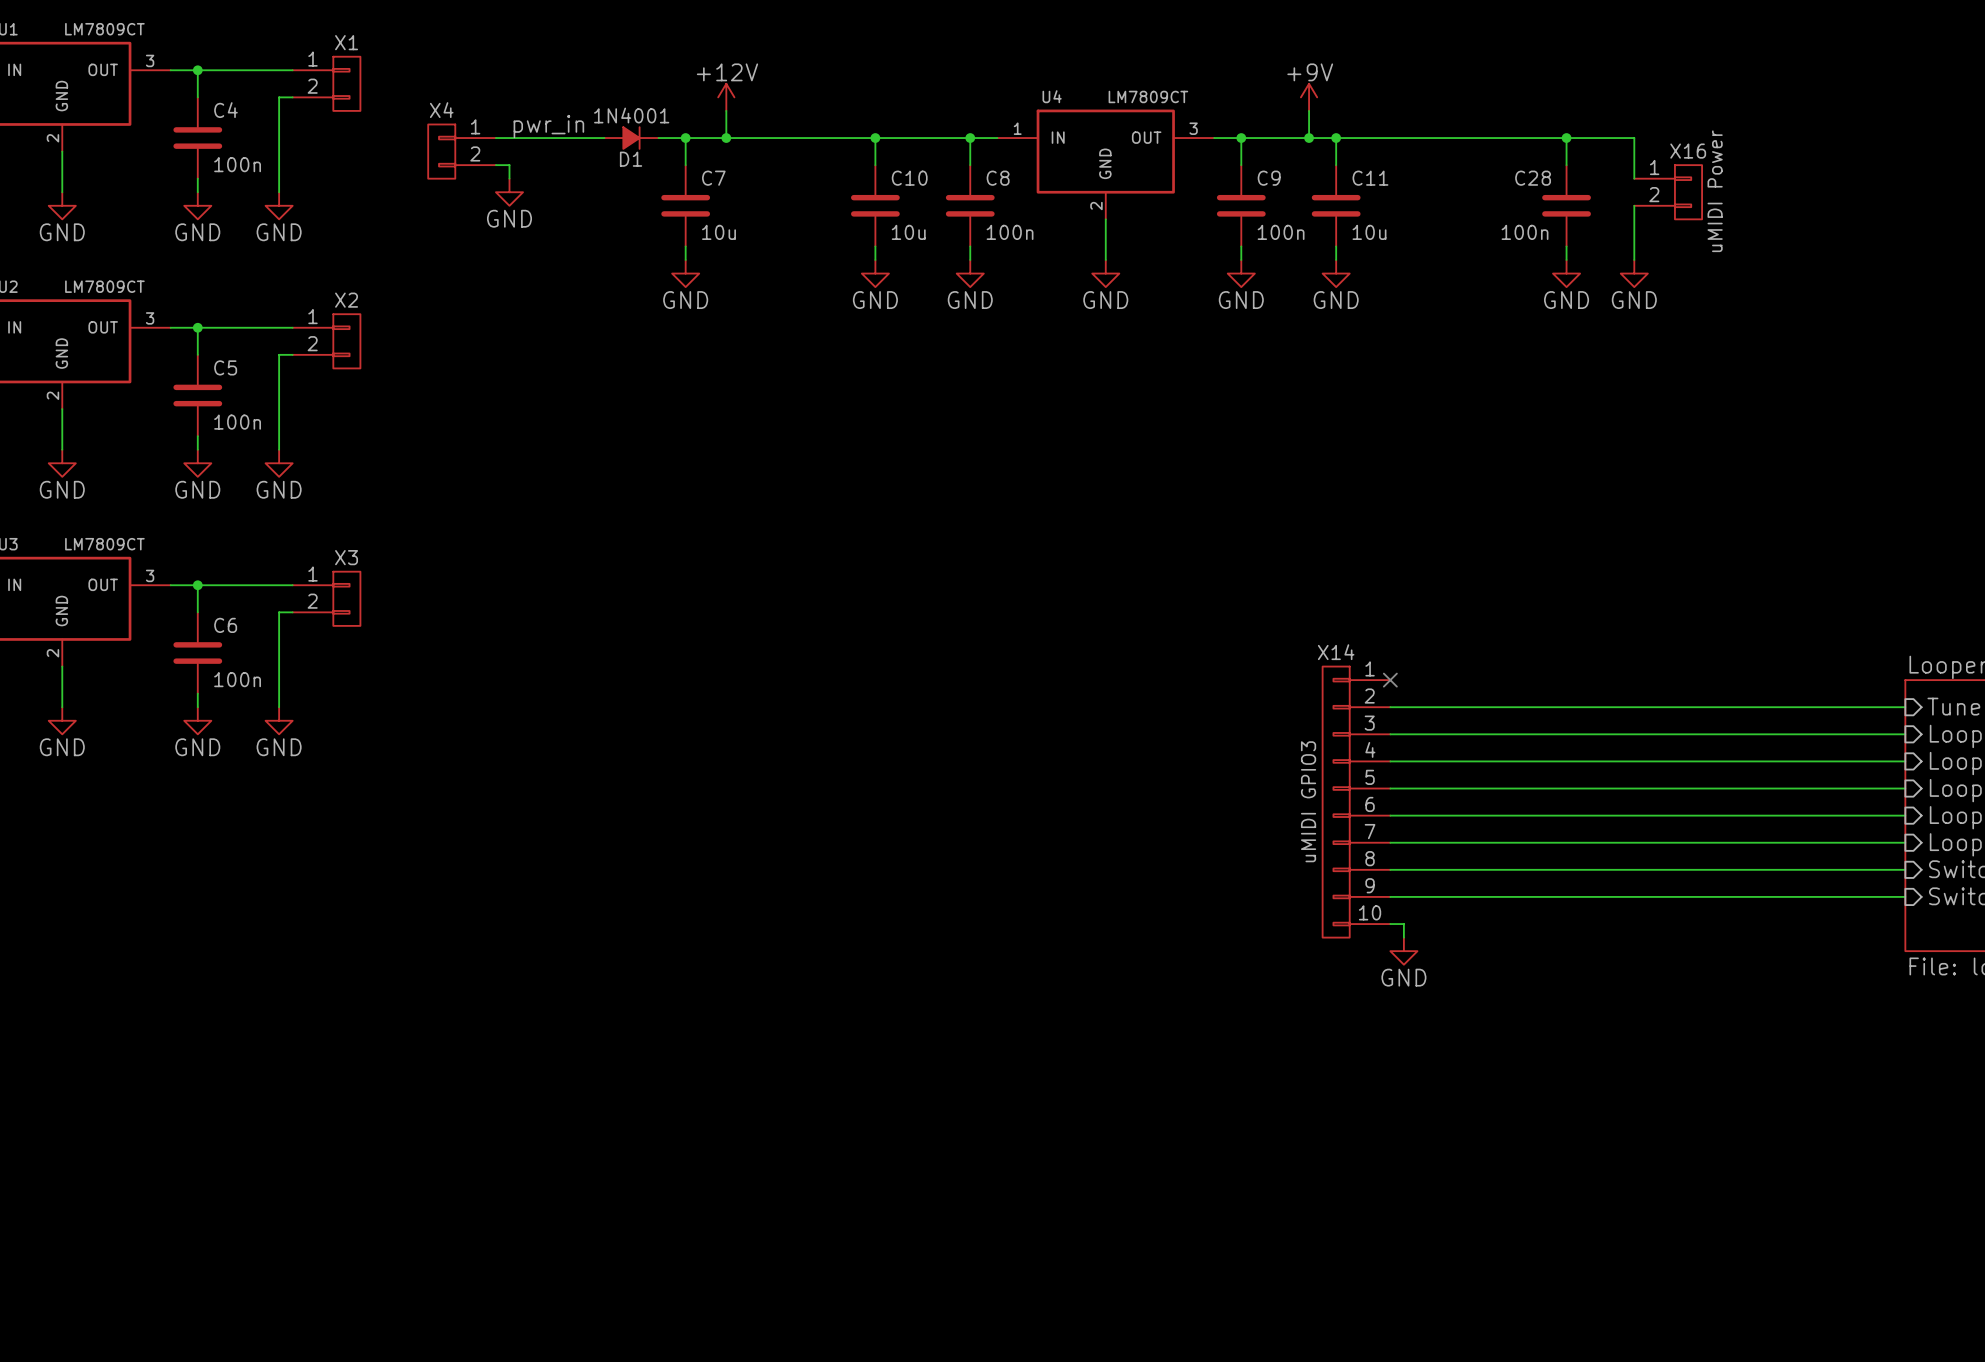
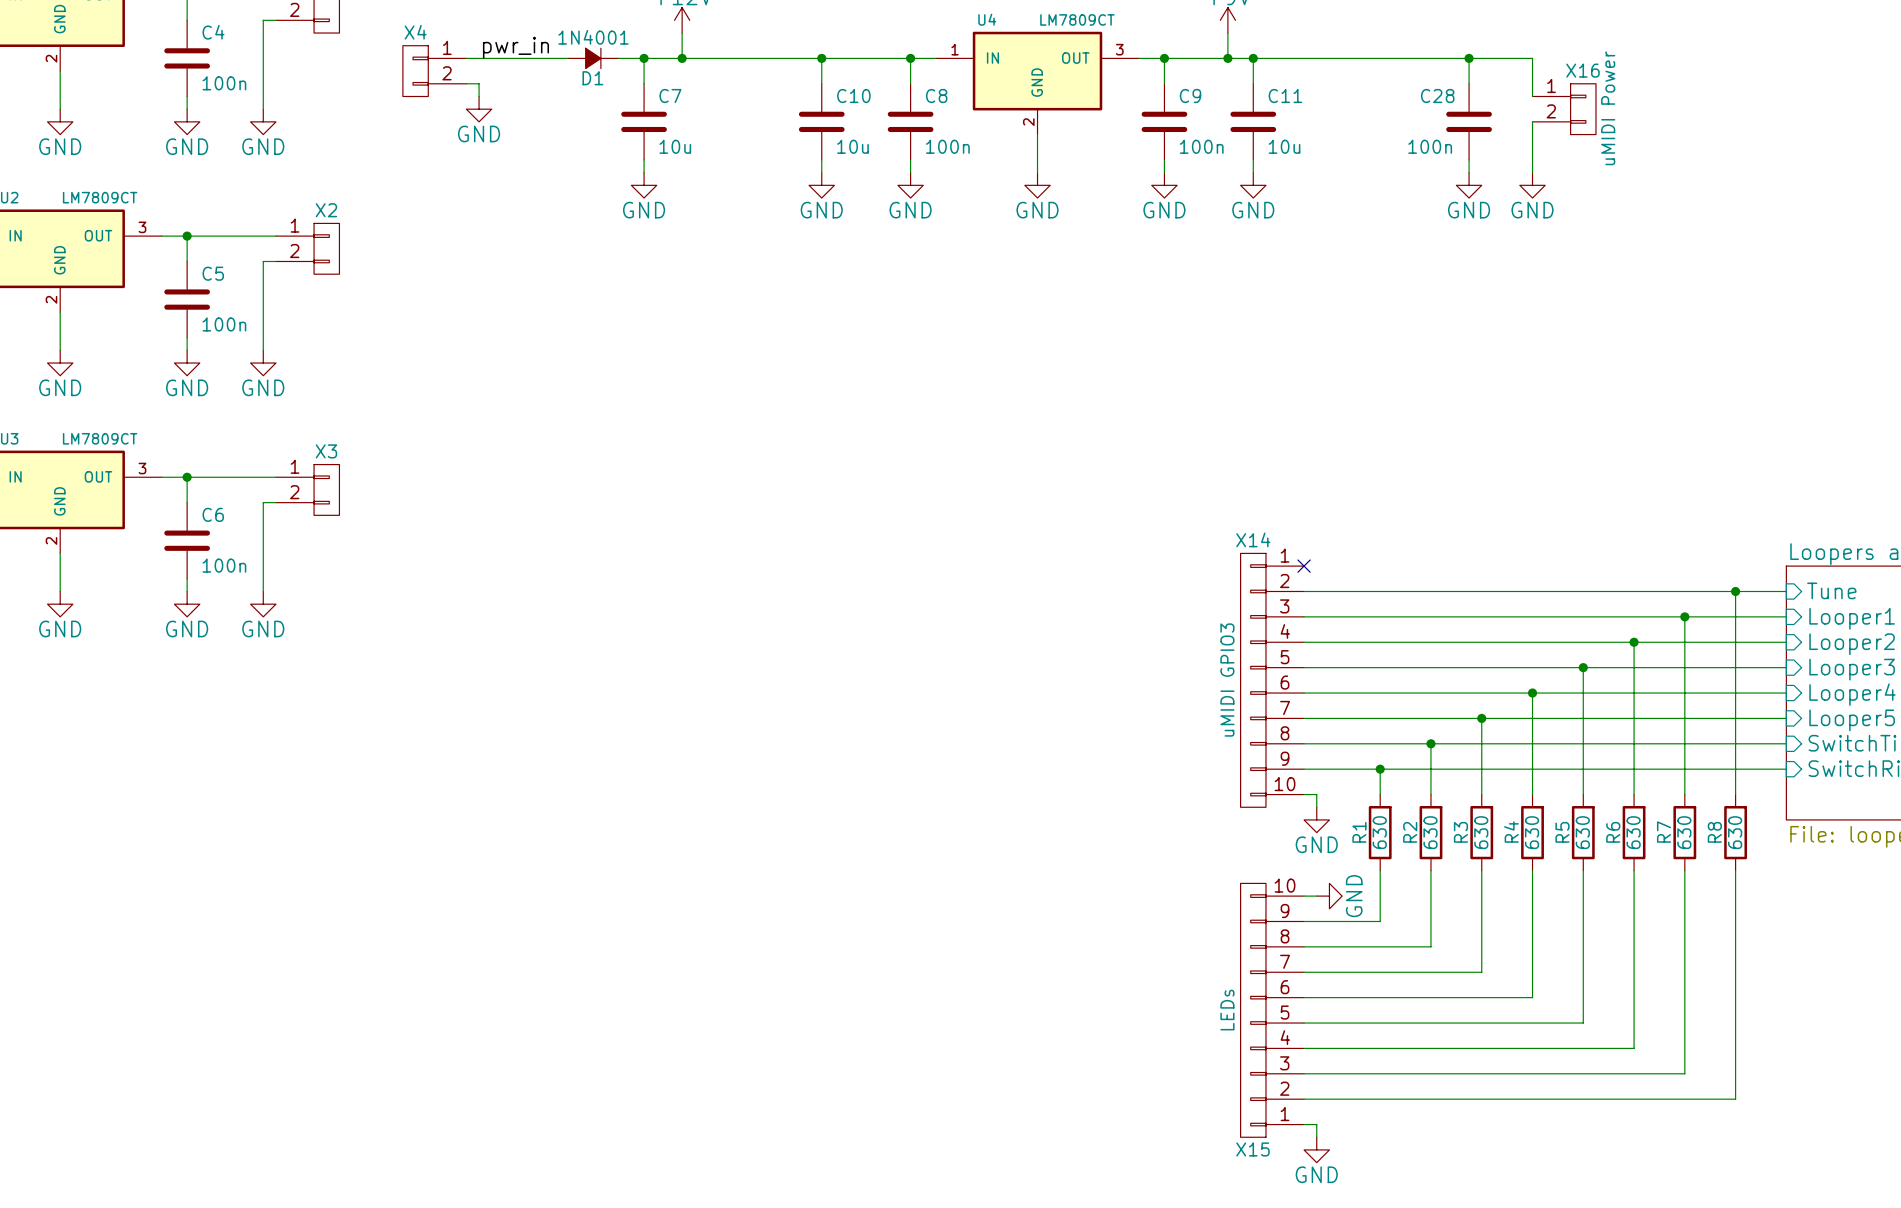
wire: none -> (1735, 591) (1735, 794)
junction: none -> (1735, 591)
wire: none -> (1684, 616) (1684, 794)
junction: none -> (1684, 616)
wire: none -> (1634, 642) (1634, 794)
junction: none -> (1634, 642)
wire: none -> (1583, 667) (1583, 794)
junction: none -> (1583, 667)
wire: none -> (1532, 693) (1532, 794)
junction: none -> (1532, 693)
wire: none -> (1481, 718) (1481, 794)
junction: none -> (1481, 718)
wire: none -> (1430, 743) (1430, 794)
junction: none -> (1430, 743)
wire: none -> (1380, 769) (1380, 794)
junction: none -> (1380, 769)
R1: none -> 630 (1380, 832)
R2: none -> 630 (1430, 832)
R3: none -> 630 (1481, 832)
R4: none -> 630 (1532, 832)
R5: none -> 630 (1583, 832)
R6: none -> 630 (1634, 832)
R7: none -> 630 (1684, 832)
R8: none -> 630 (1735, 832)
wire: none -> (1380, 870) (1380, 921) (1304, 921)
wire: none -> (1430, 870) (1430, 946) (1304, 946)
wire: none -> (1481, 870) (1481, 972) (1304, 972)
wire: none -> (1532, 870) (1532, 997) (1304, 997)
wire: none -> (1583, 870) (1583, 1023) (1304, 1023)
wire: none -> (1634, 870) (1634, 1048) (1304, 1048)
wire: none -> (1684, 870) (1684, 1073) (1304, 1073)
wire: none -> (1735, 870) (1735, 1099) (1304, 1099)
wire: none -> (1304, 896) (1316, 896)
power symbol: none -> GND (1329, 896)
X15: none -> LEDs (1272, 1010)
wire: none -> (1304, 1124) (1316, 1124) (1316, 1137)
power symbol: none -> GND (1316, 1149)

